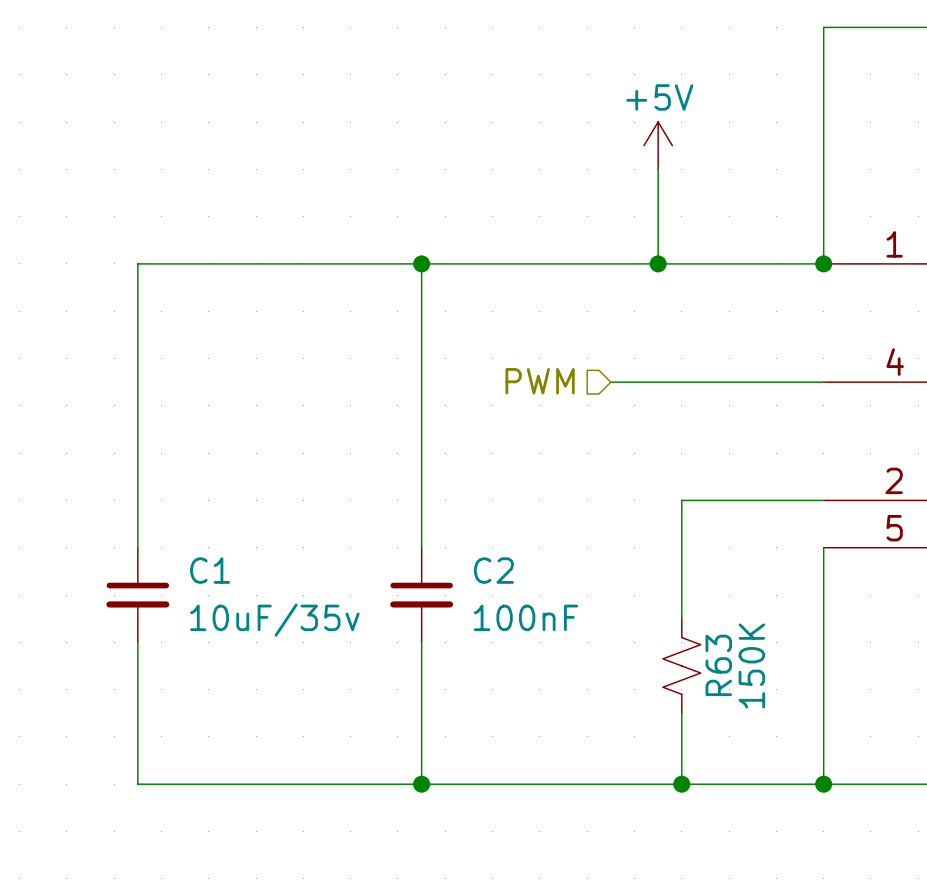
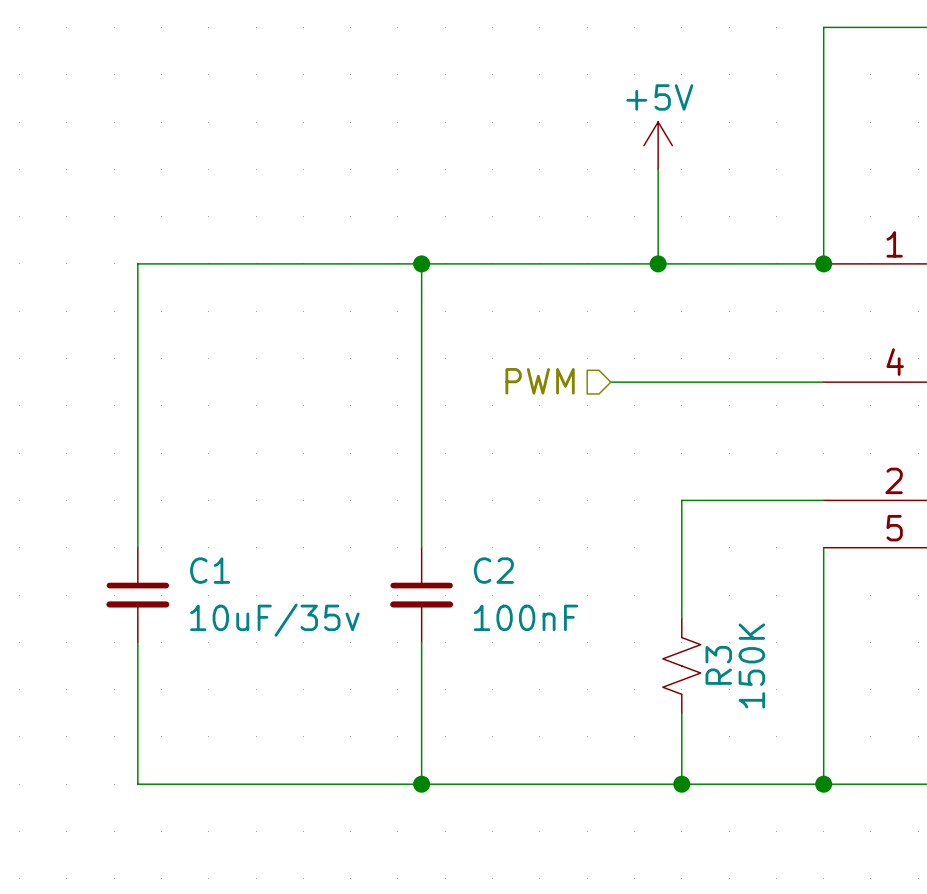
R63 name: R63 (718, 665) -> R3 (718, 665)

